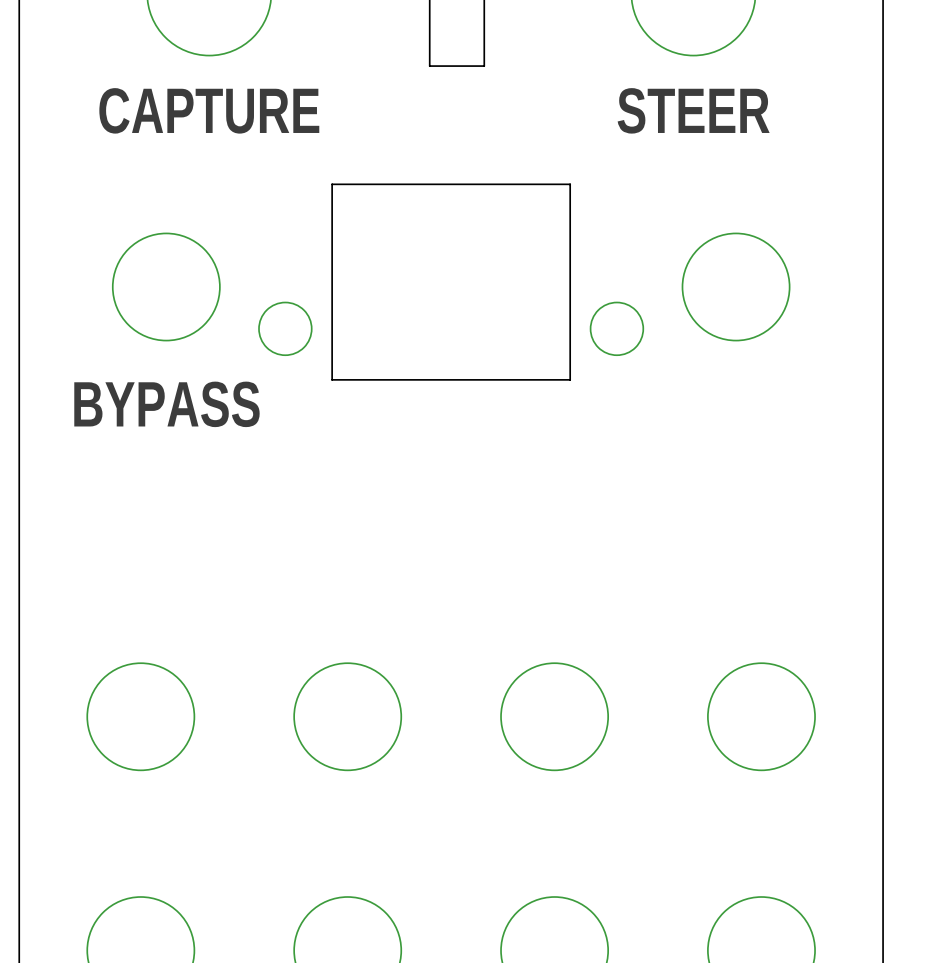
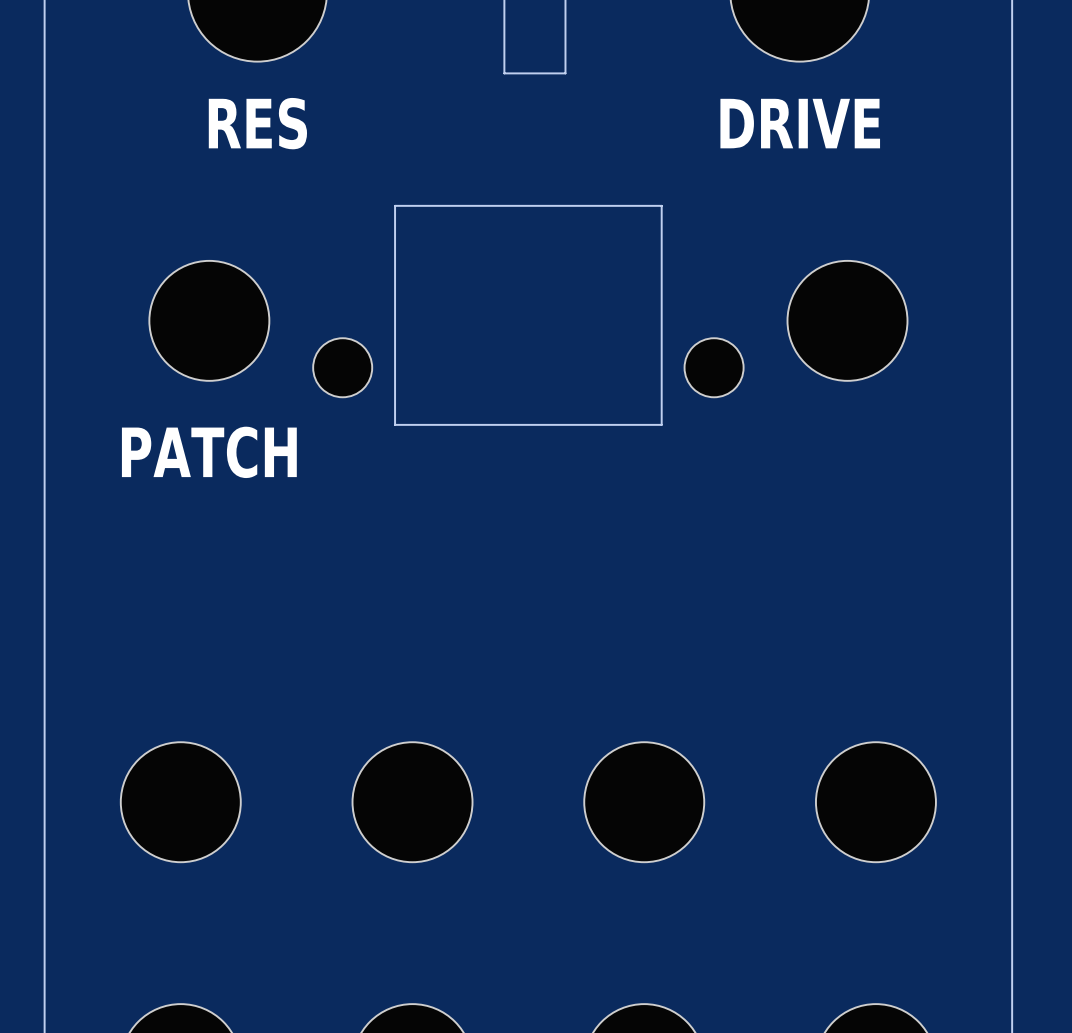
text: CAPTURE (209, 110) -> RES (257, 123)
text: STEER (693, 110) -> DRIVE (800, 123)
text: BYPASS (166, 404) -> PATCH (209, 452)

